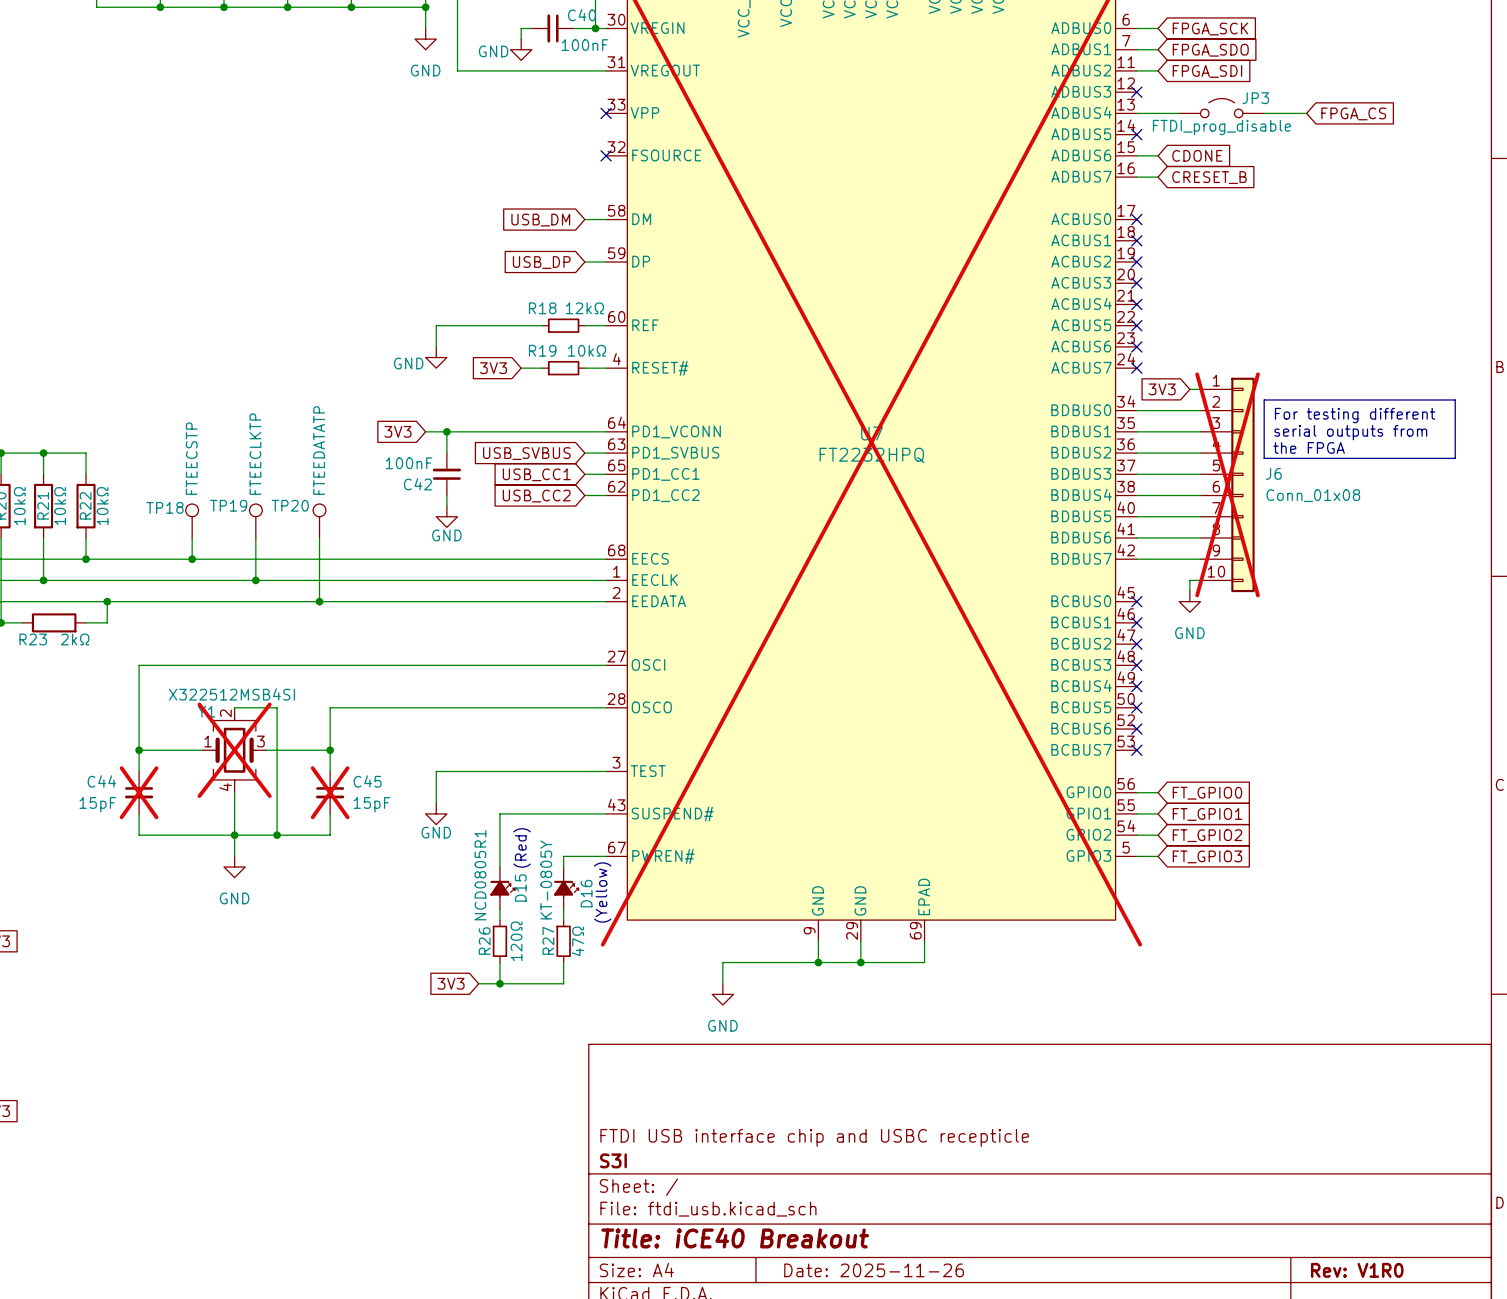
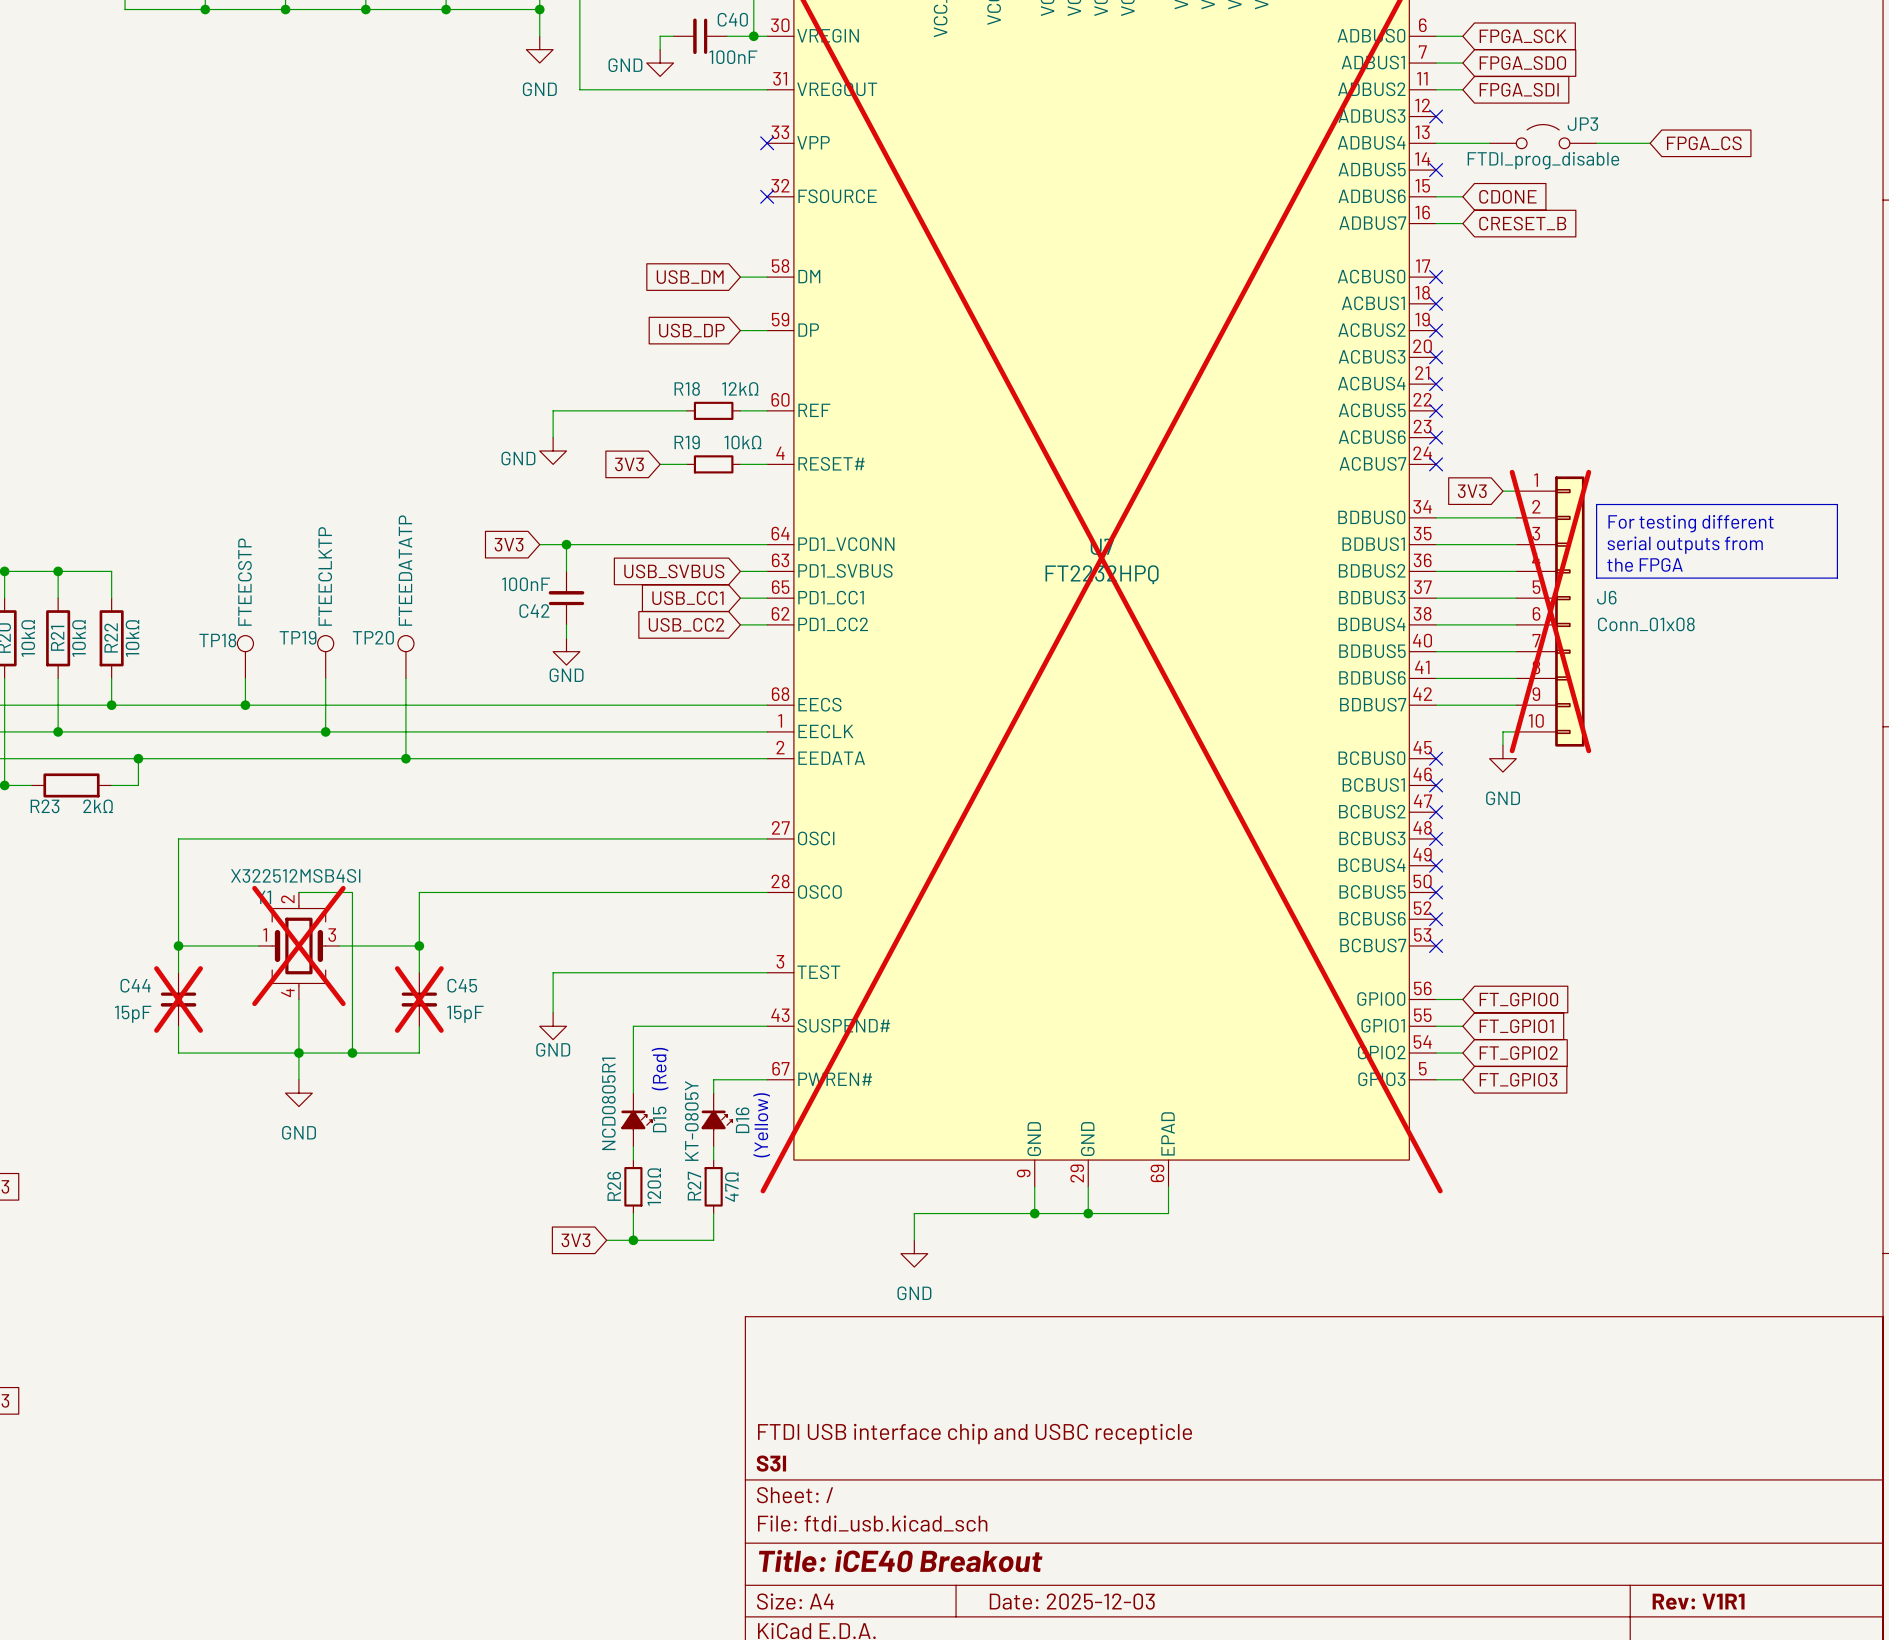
title block: Date: 2025-11-26 (874, 1270) -> Date: 2025-12-03 (1072, 1601)
title block: Rev: V1R0 (1357, 1270) -> Rev: V1R1 (1698, 1601)

